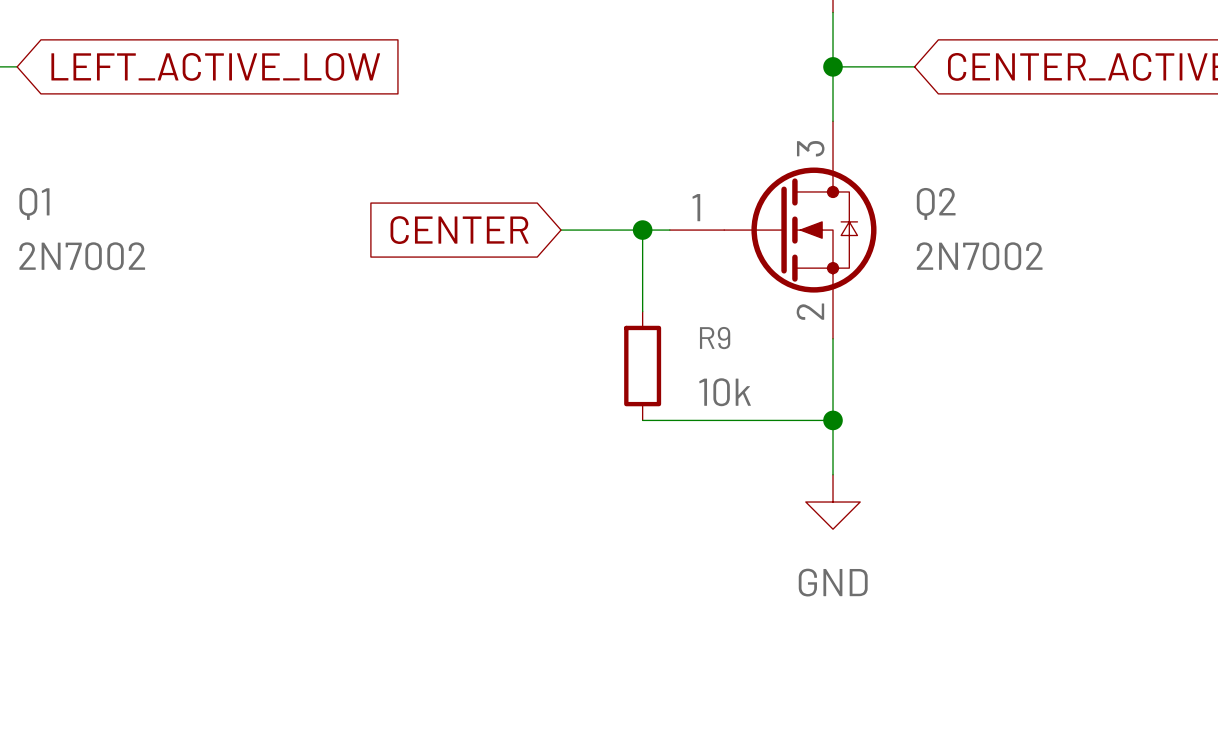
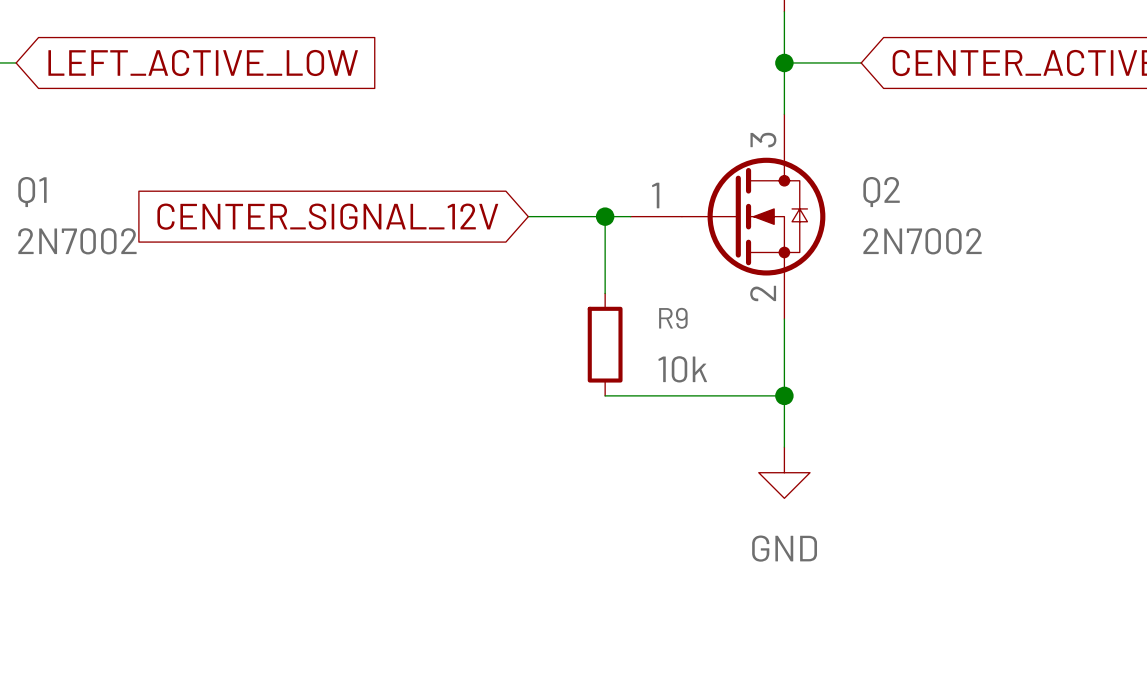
global label: CENTER (459, 230) -> CENTER_SIGNAL_12V (327, 216)

